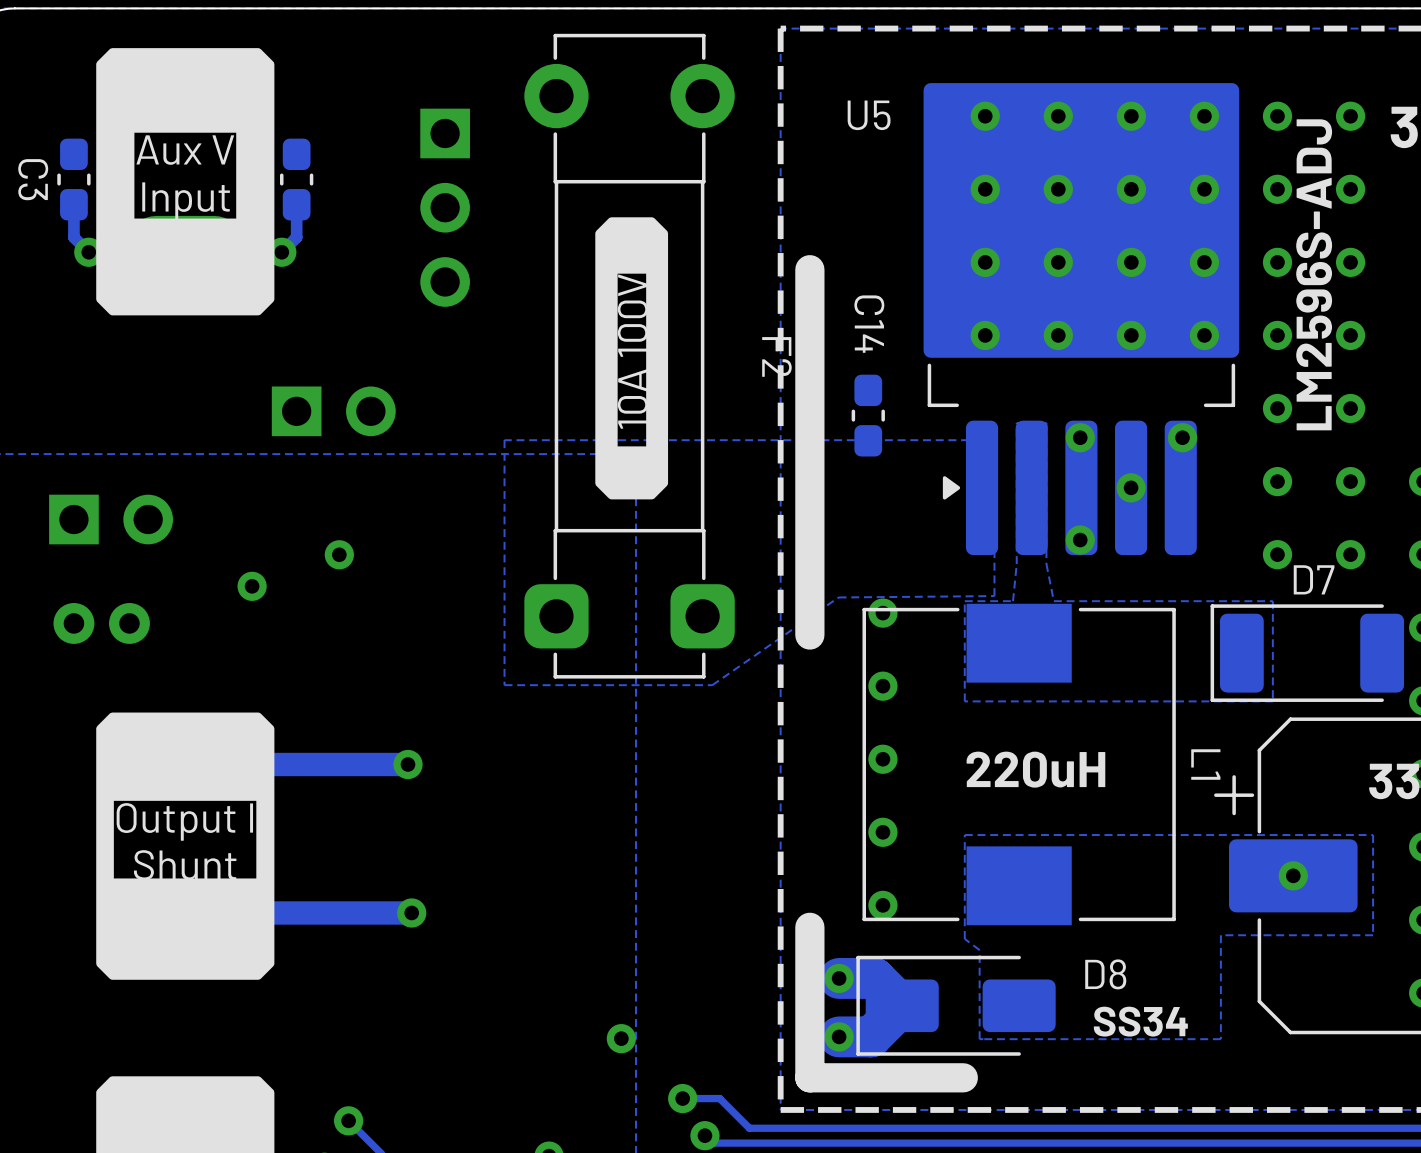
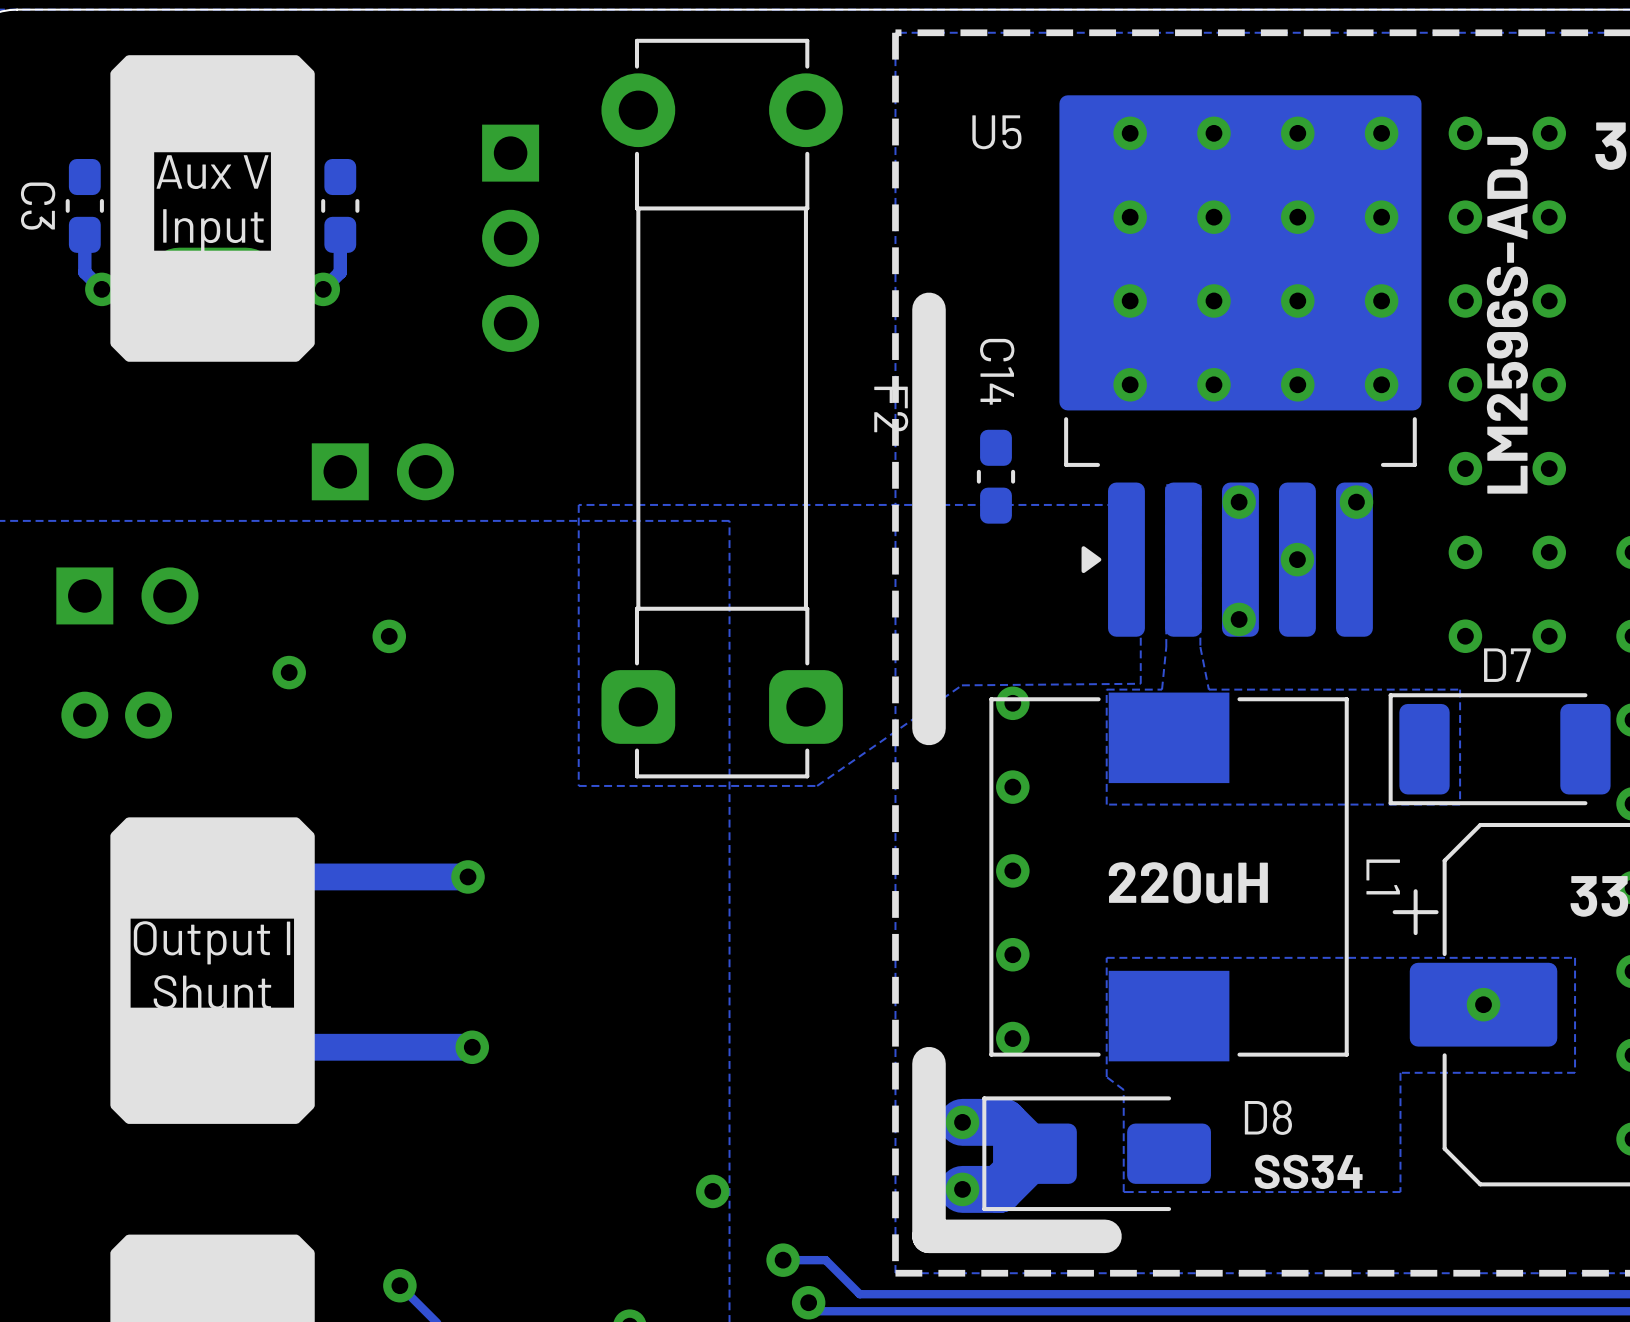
drawing: [595, 217, 669, 500] -> none
text: 10A 100V (632, 351) -> none

